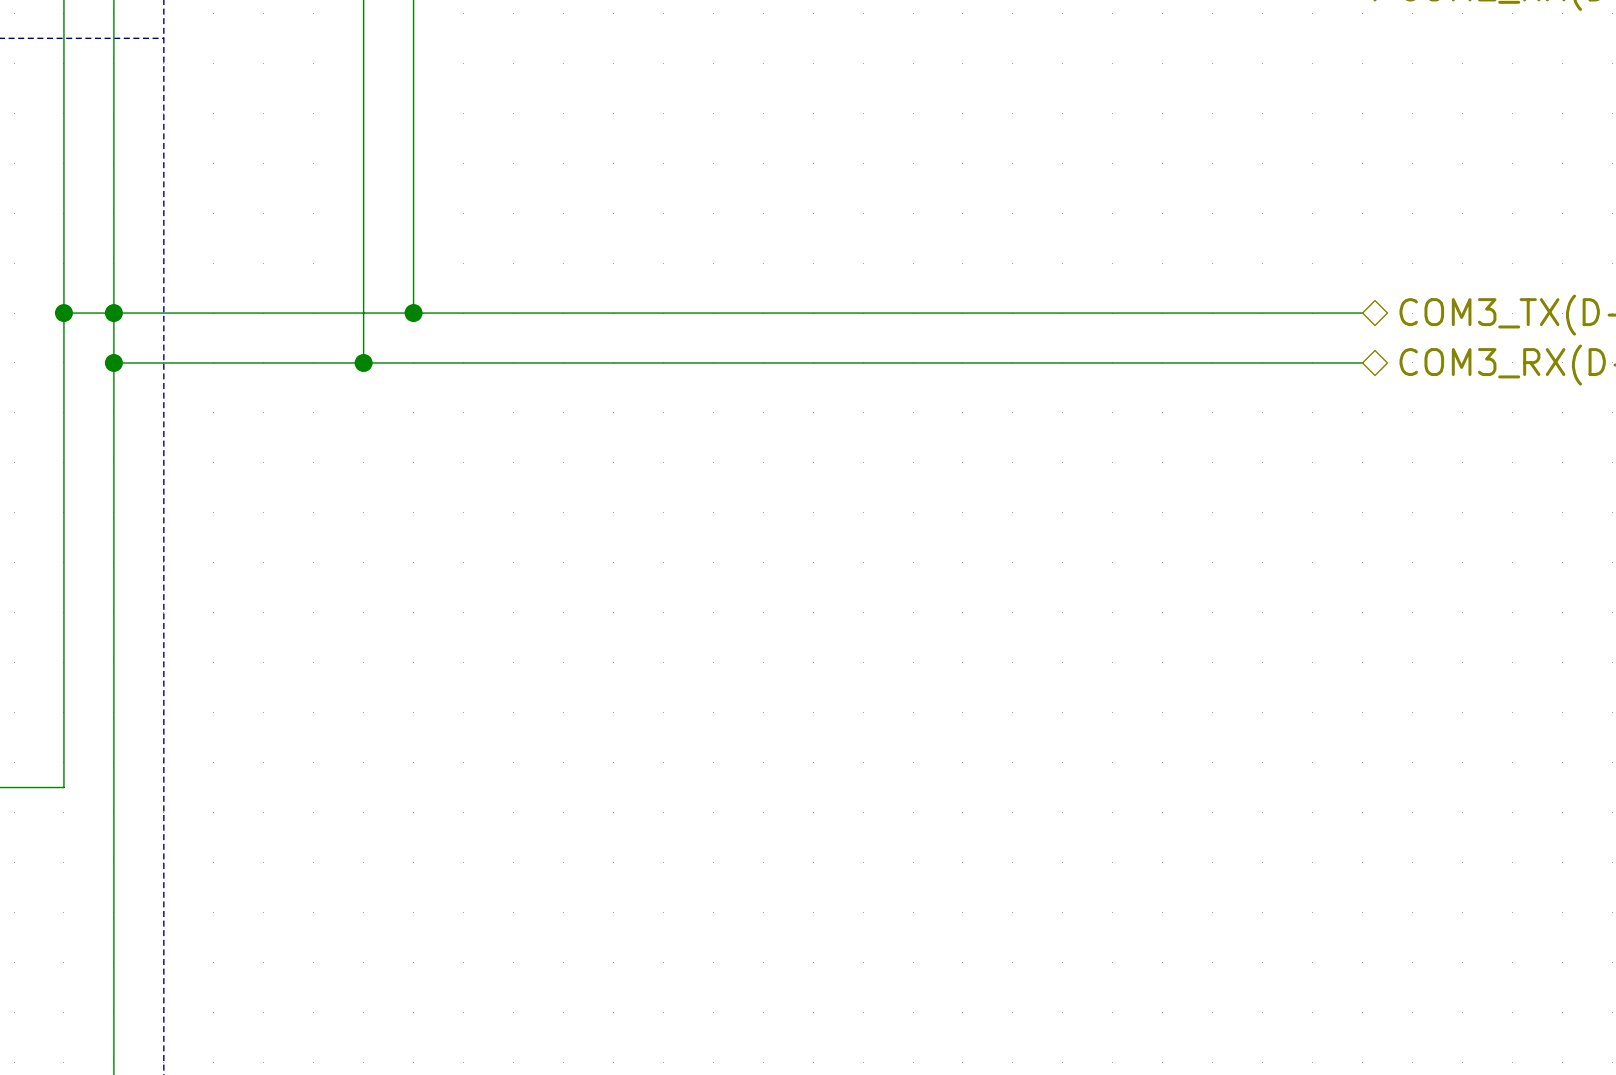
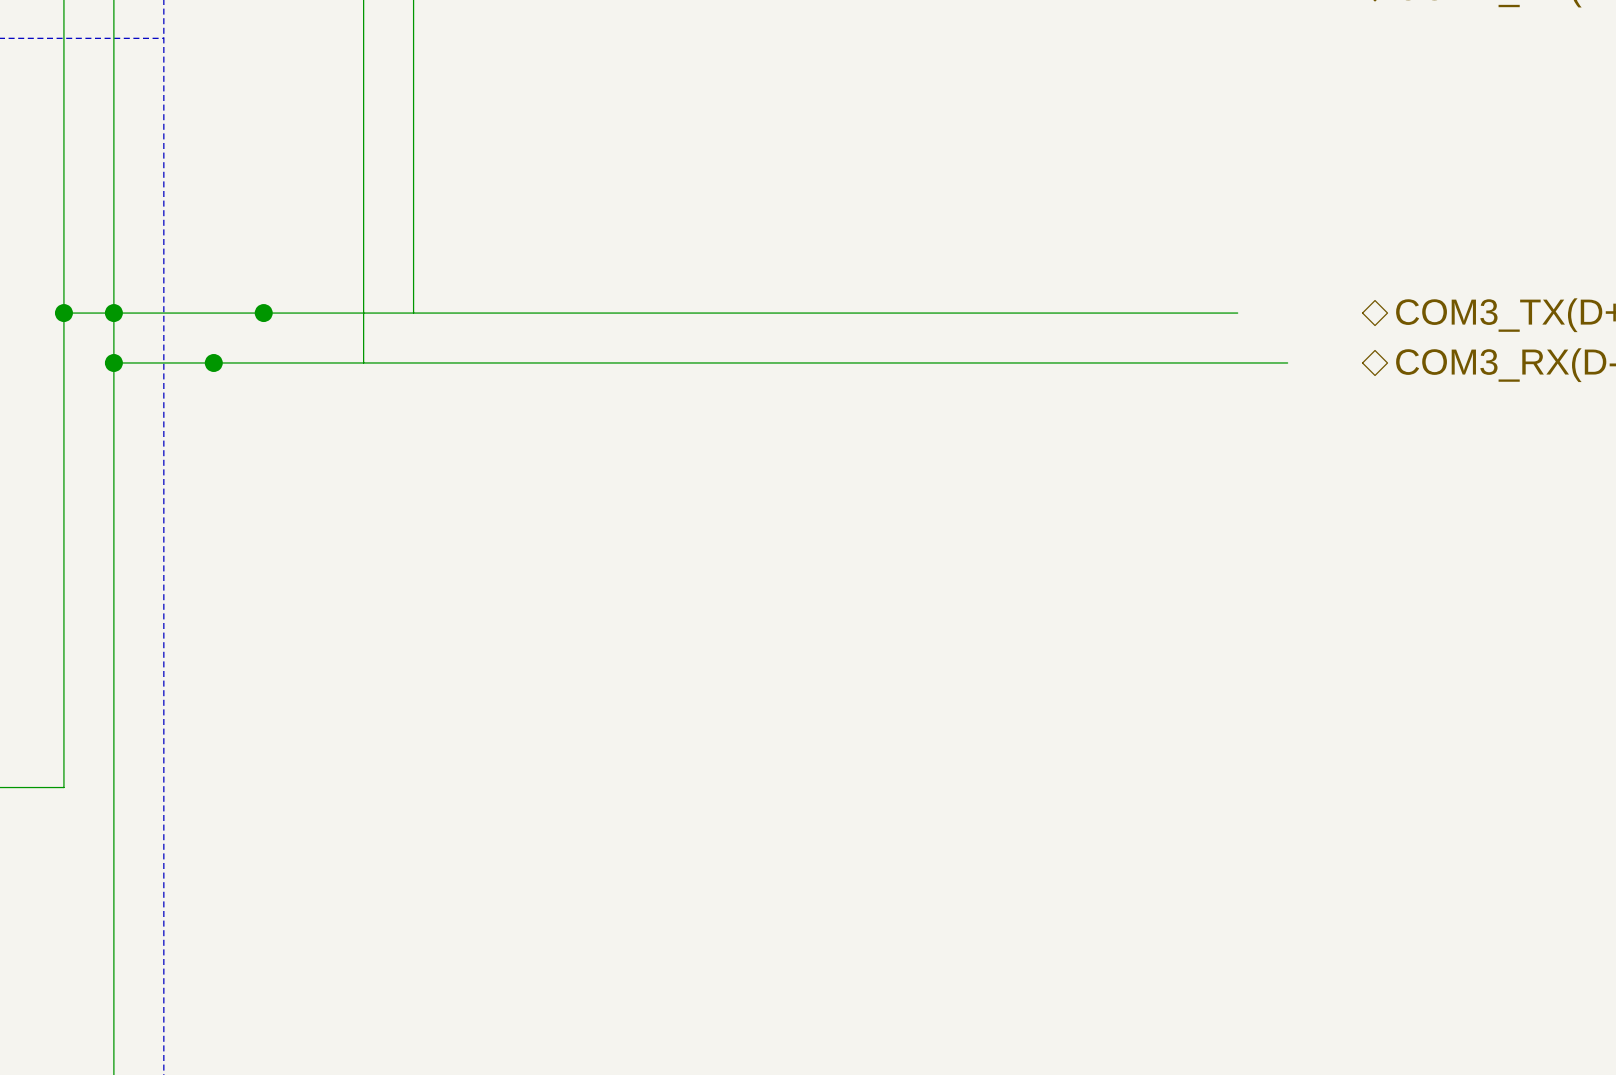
junction: none -> (263, 313)
junction: (413, 313) -> none
wire: (1237, 313) (1362, 313) -> none
junction: none -> (213, 362)
junction: (363, 362) -> none
wire: (1287, 362) (1362, 362) -> none

